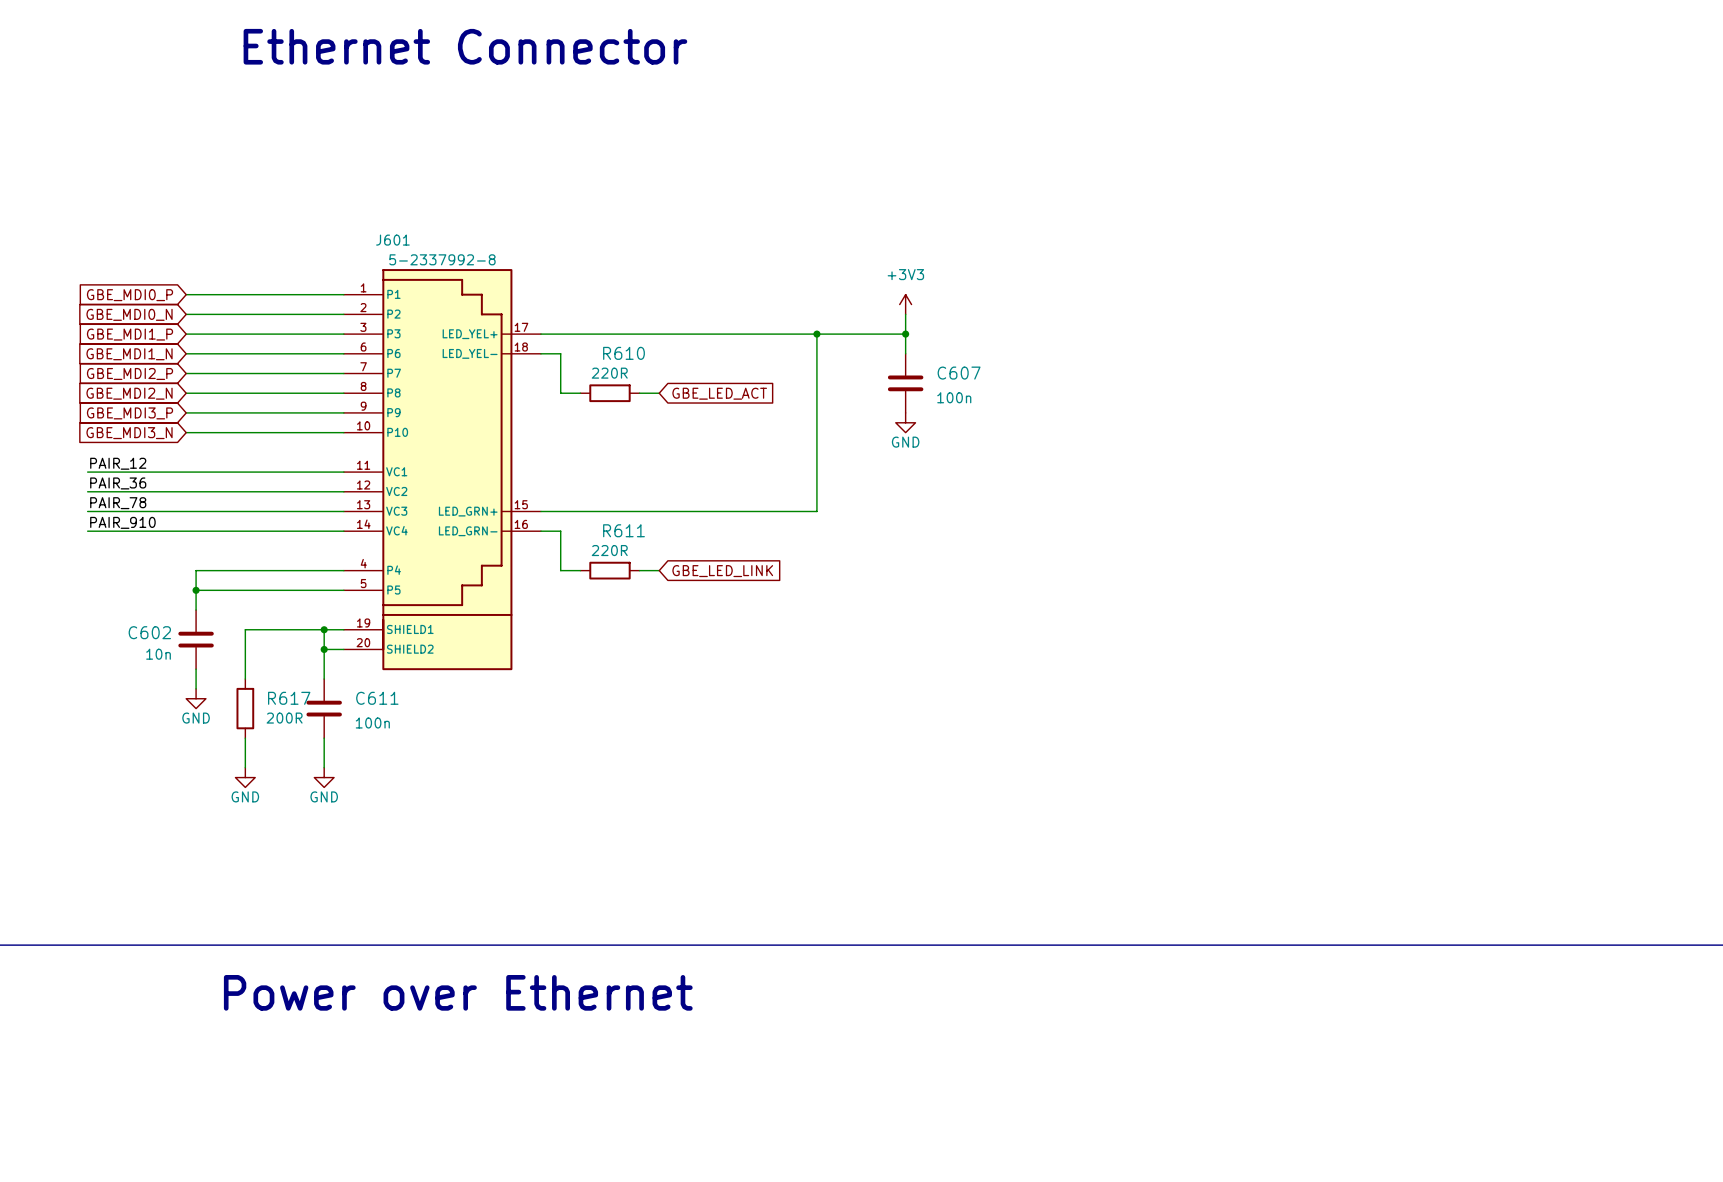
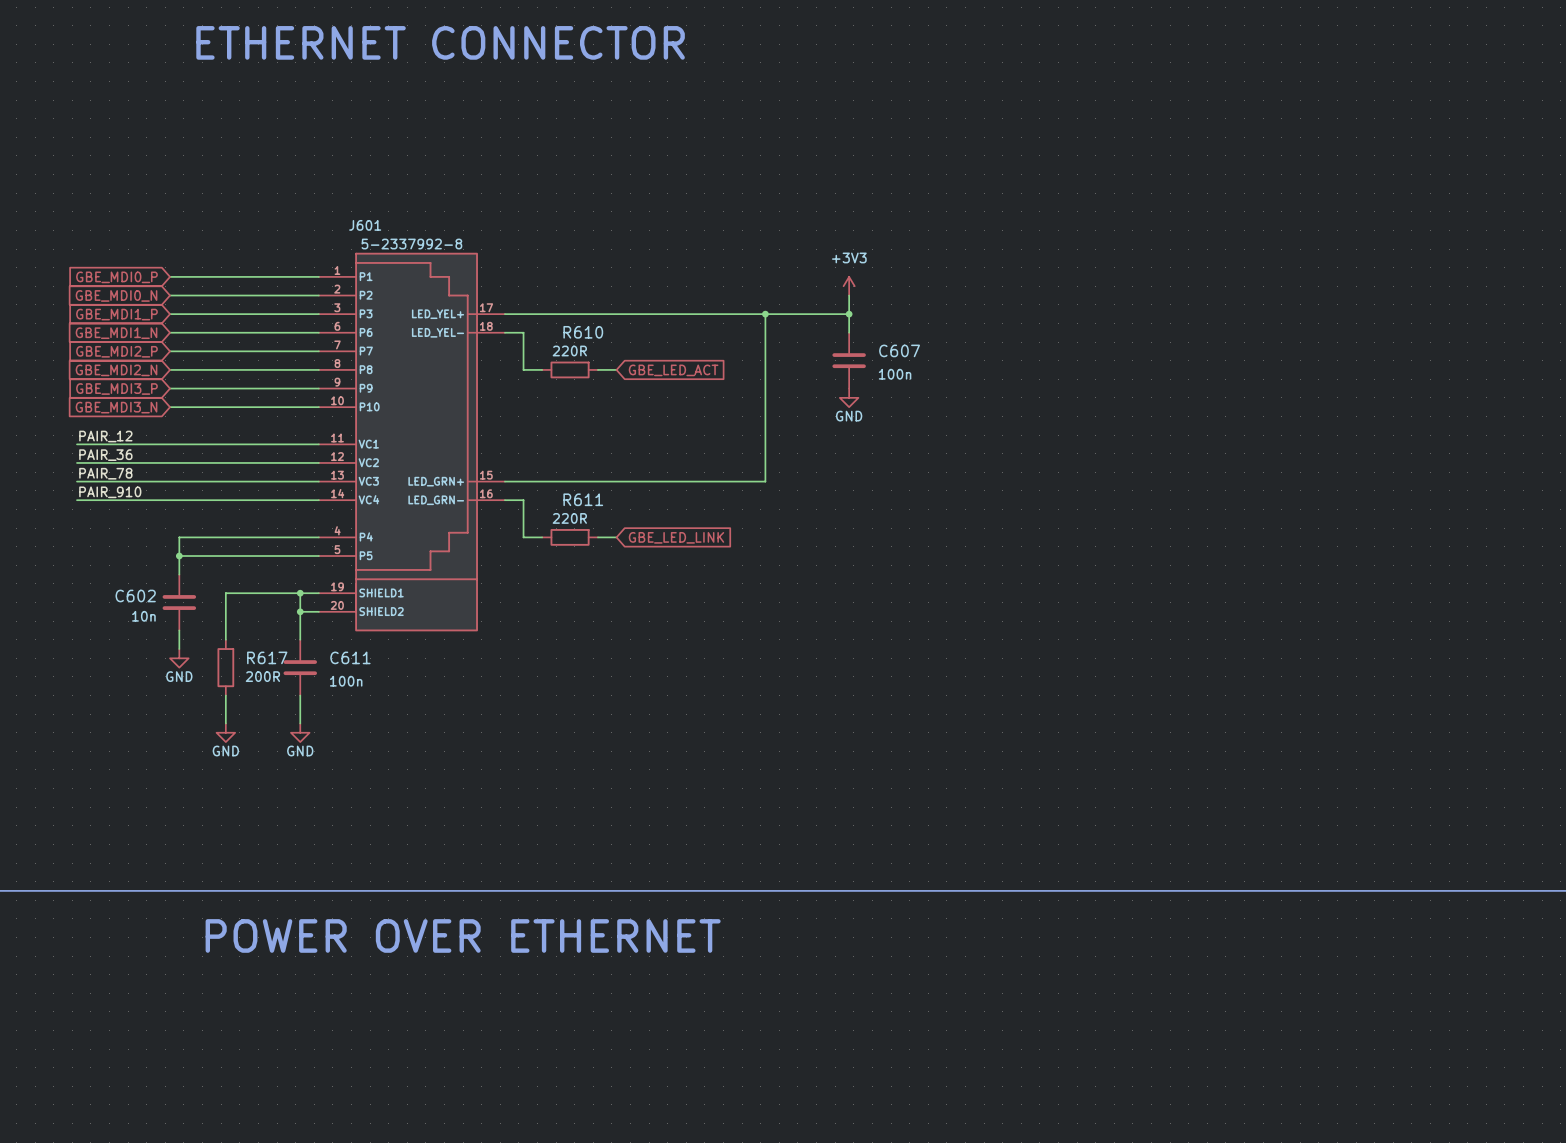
text: Ethernet Connector (465, 46) -> none
text: none -> ETHERNET CONNECTOR (440, 42)
text: Power over Ethernet (458, 992) -> POWER OVER ETHERNET (463, 935)

